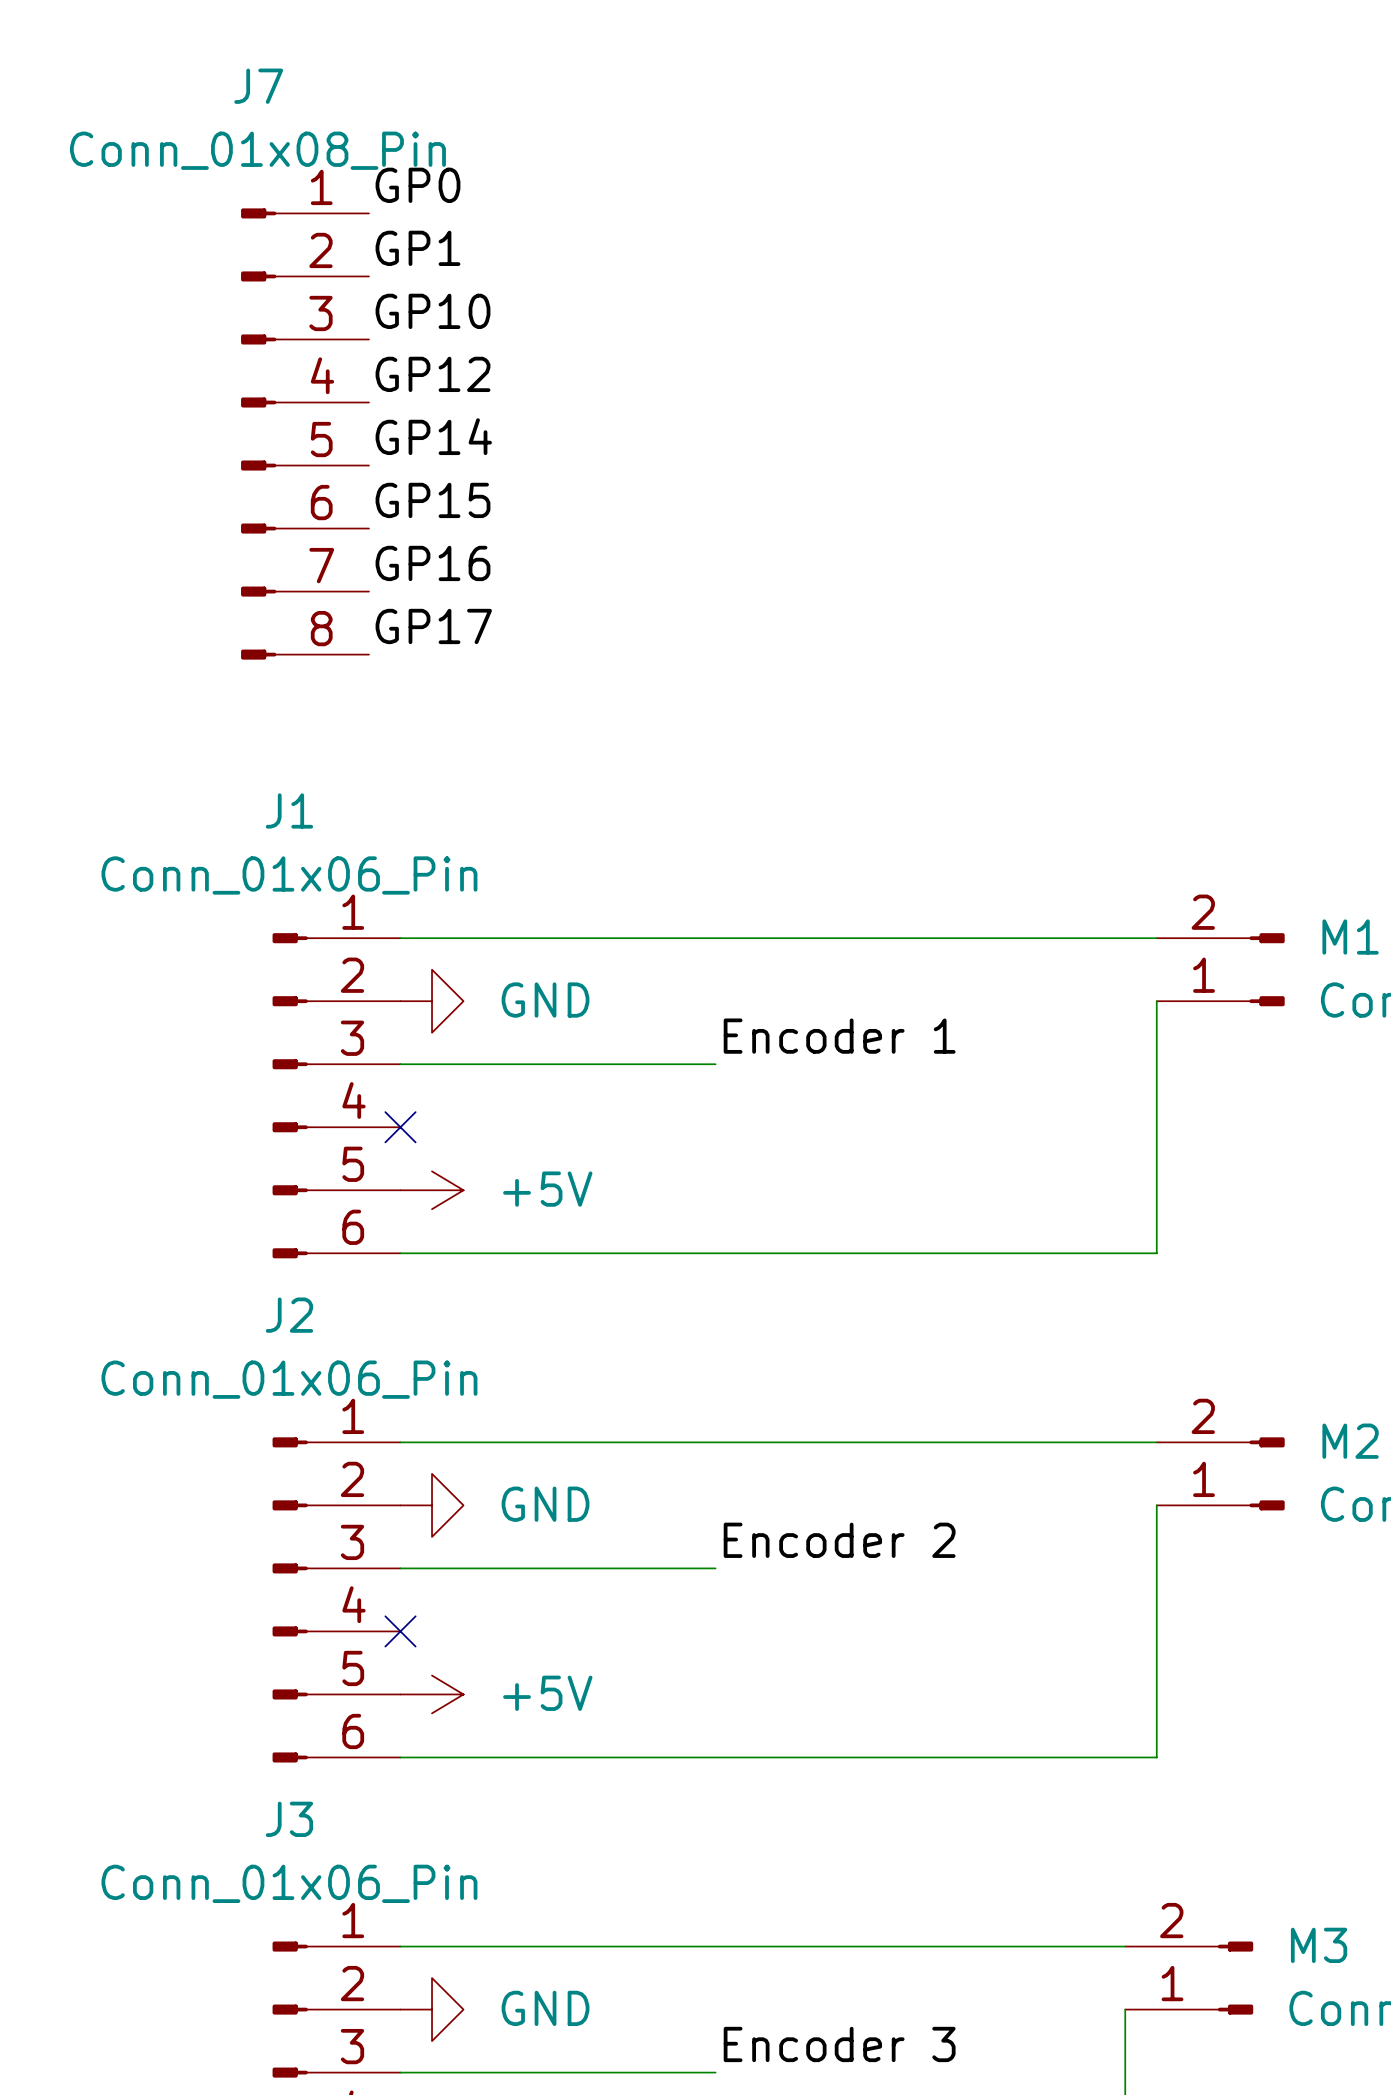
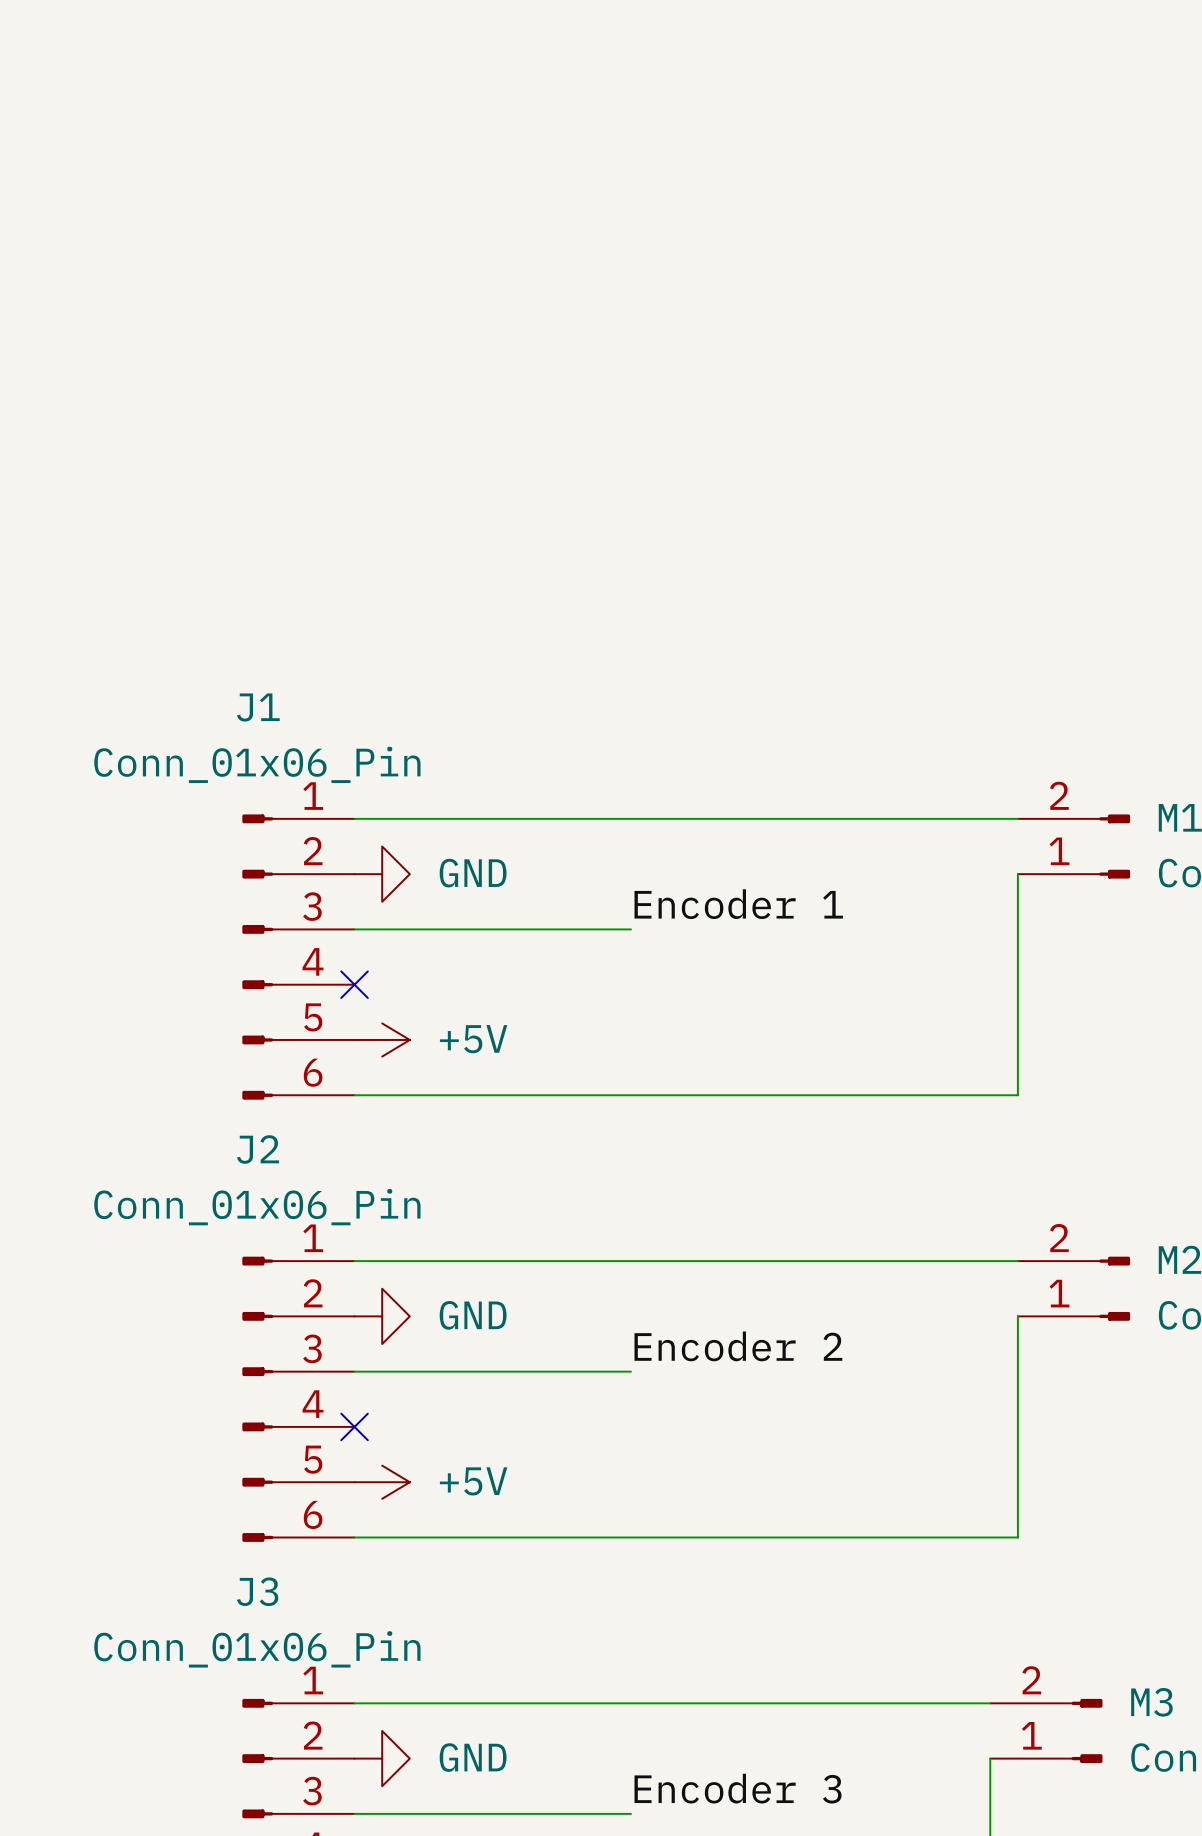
label: GP0 (417, 185) -> none
label: GP1 (417, 248) -> none
label: GP10 (432, 311) -> none
label: GP12 (432, 374) -> none
J7: Conn_01x08_Pin (305, 434) -> none
label: GP14 (433, 436) -> none
label: GP15 (432, 500) -> none
label: GP16 (432, 563) -> none
label: GP17 (433, 626) -> none

